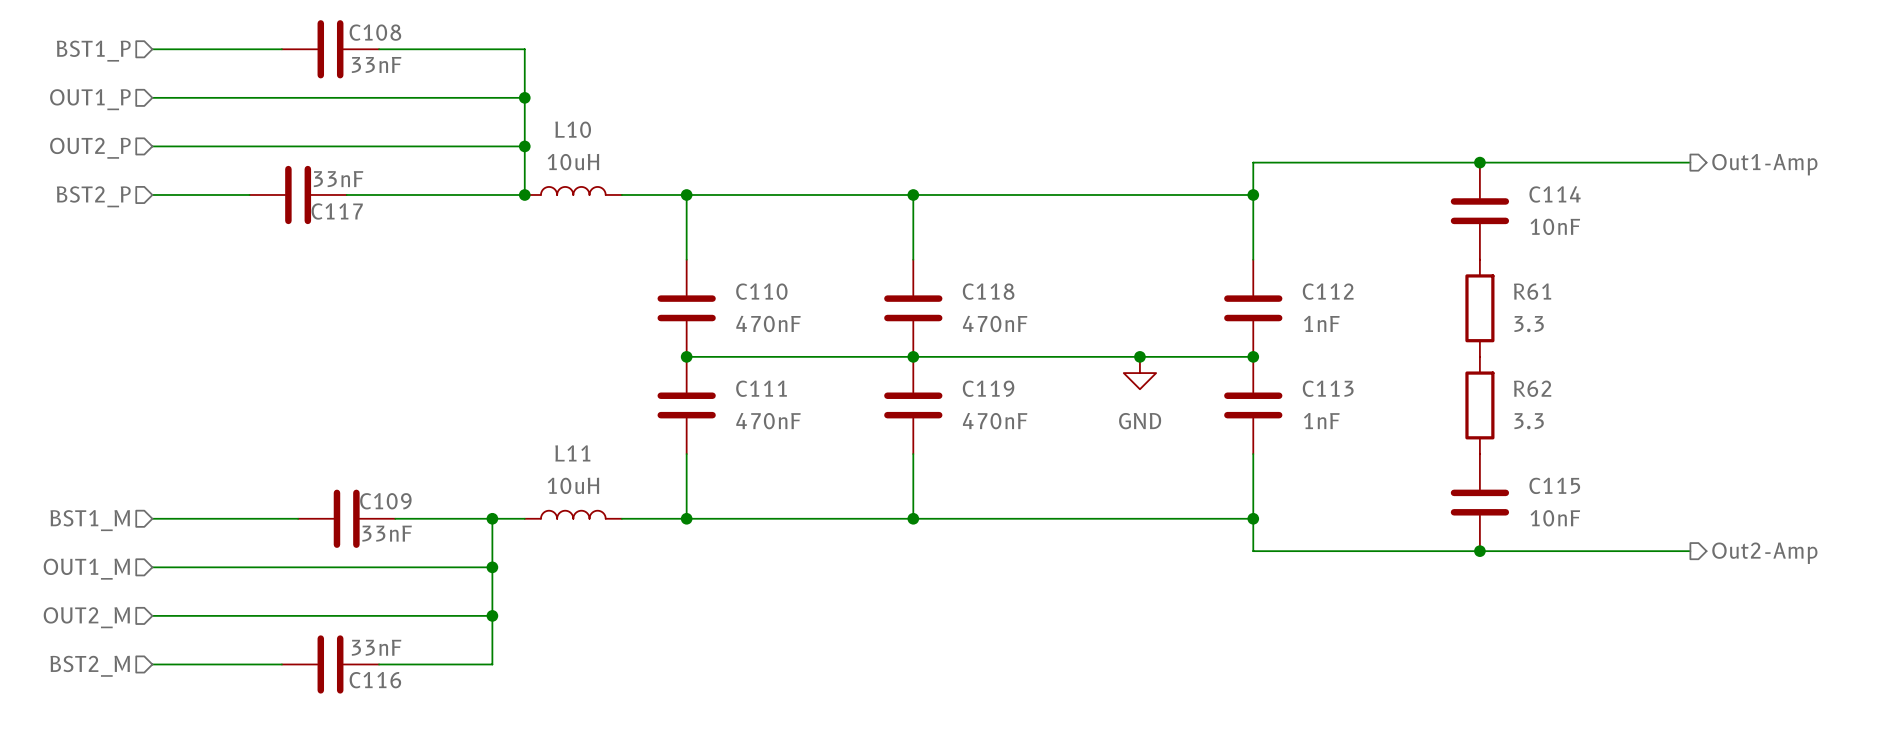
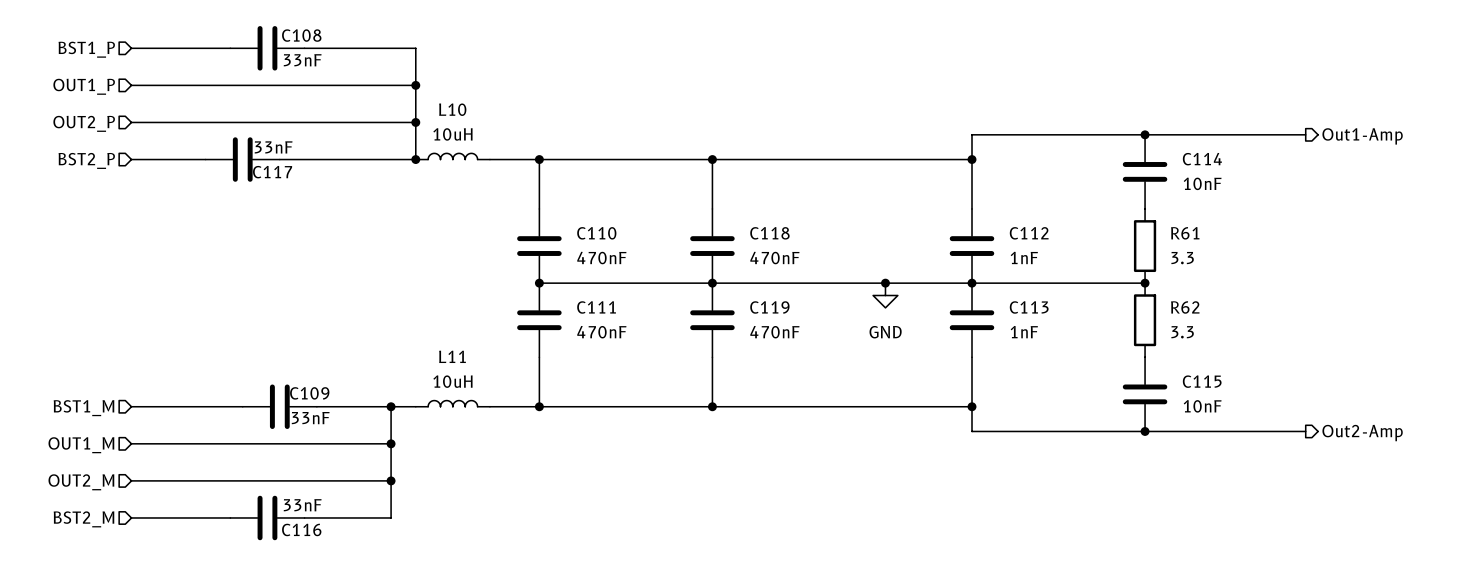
wire: none -> (972, 283) (1145, 283)
junction: none -> (1145, 283)

